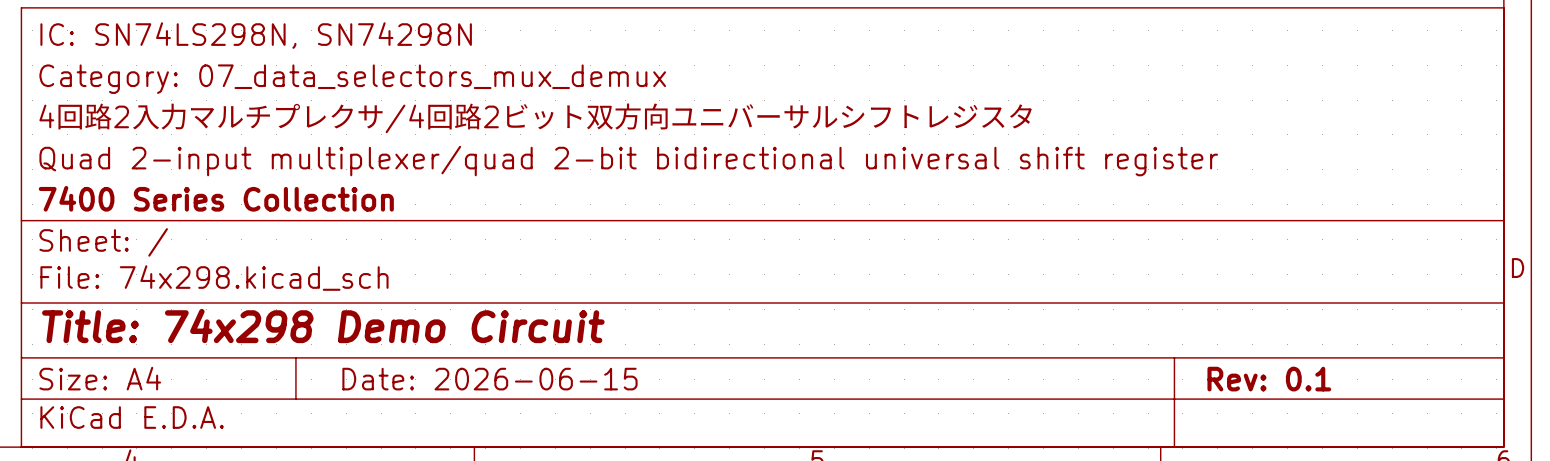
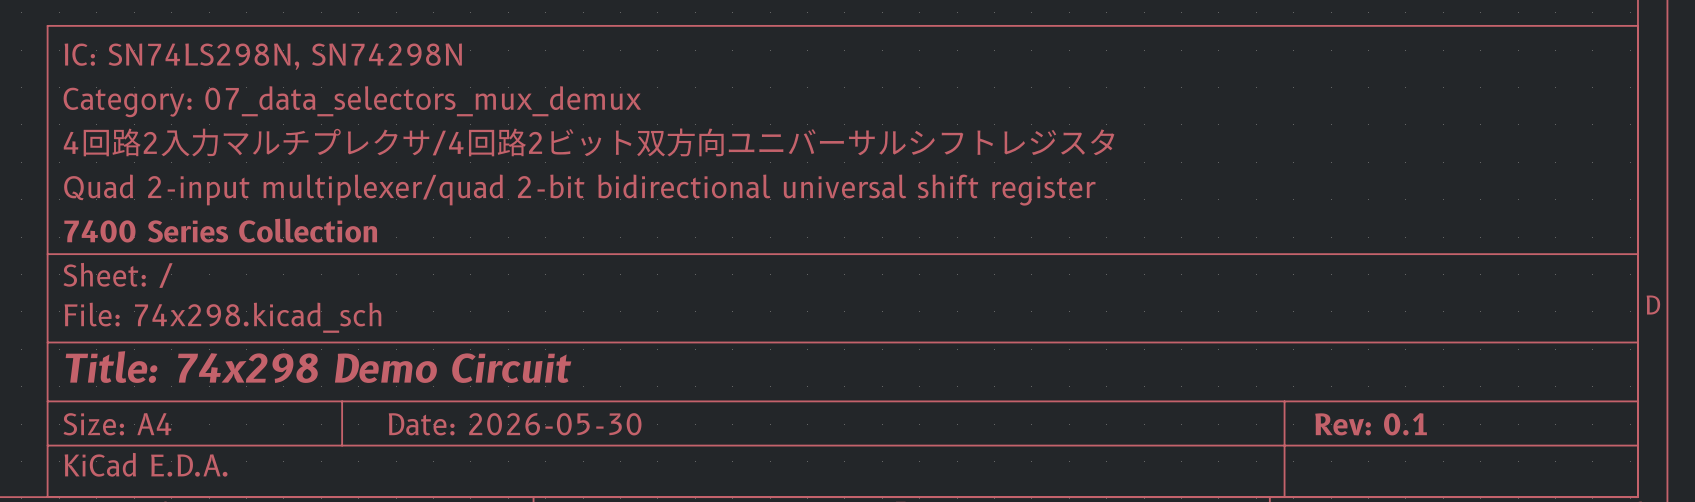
title block: Date: 2026-06-15 (489, 379) -> Date: 2026-05-30 (515, 424)

